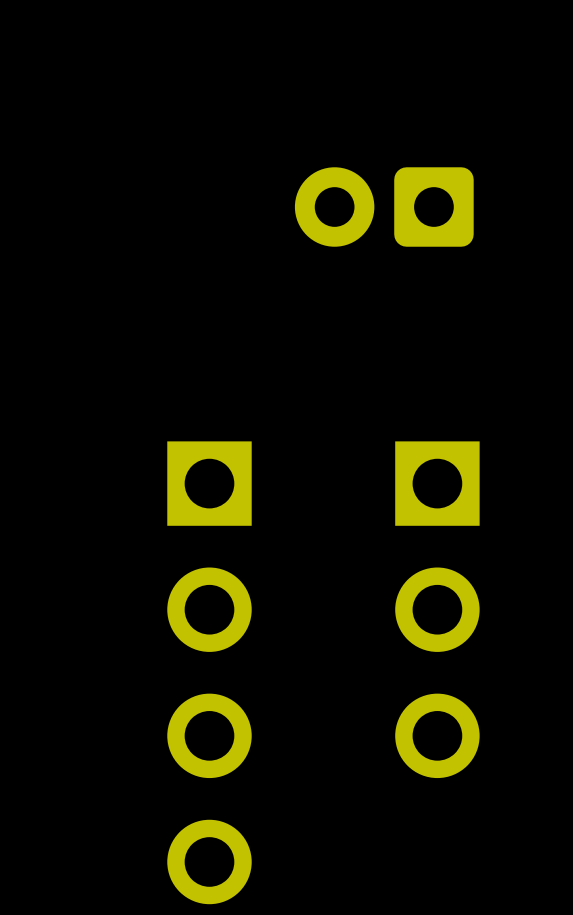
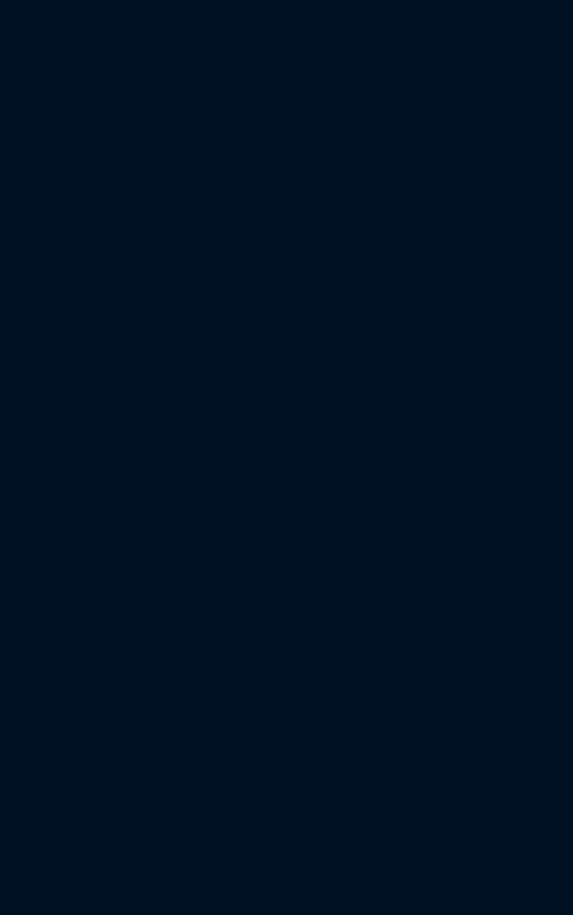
part: (384, 207) -> none
part: (437, 609) -> none
part: (209, 672) -> none

